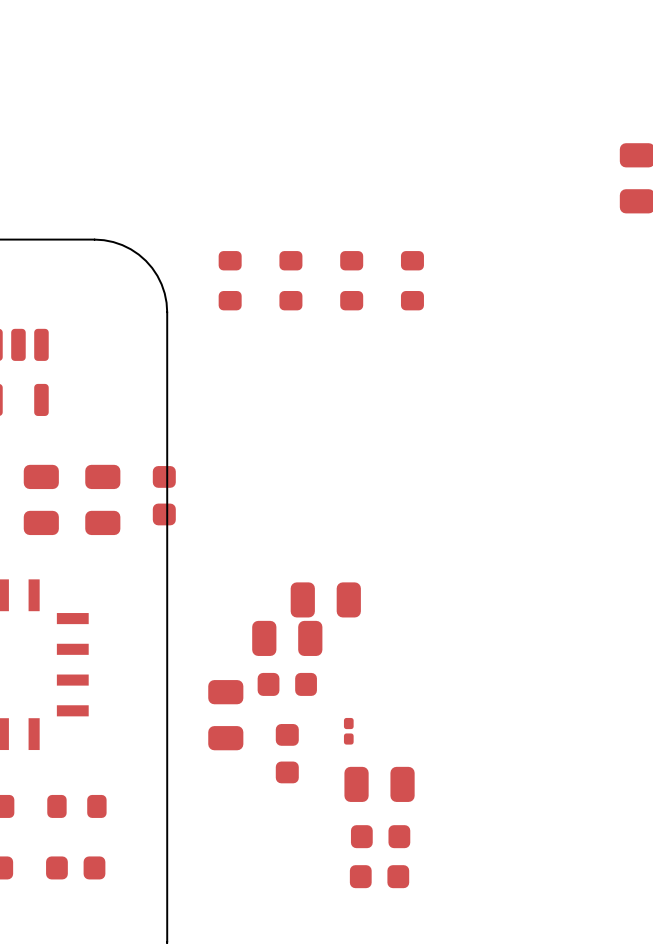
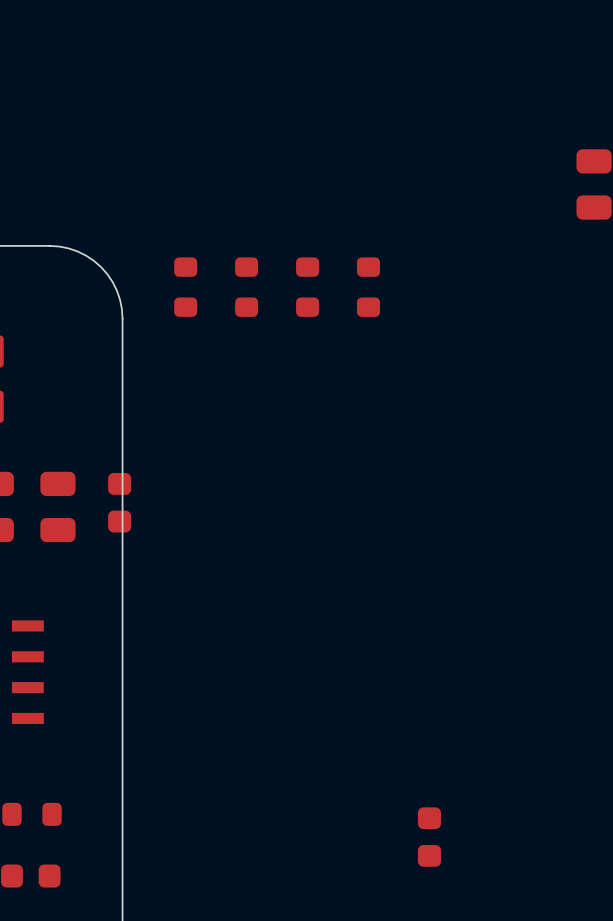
part: (325, 599) -> none
part: (287, 638) -> none
part: (287, 684) -> none
part: (225, 715) -> none
part: (348, 731) -> none
part: (287, 753) -> none
part: (379, 784) -> none
part: none -> (429, 837)
part: (380, 836) -> none
part: (379, 876) -> none

